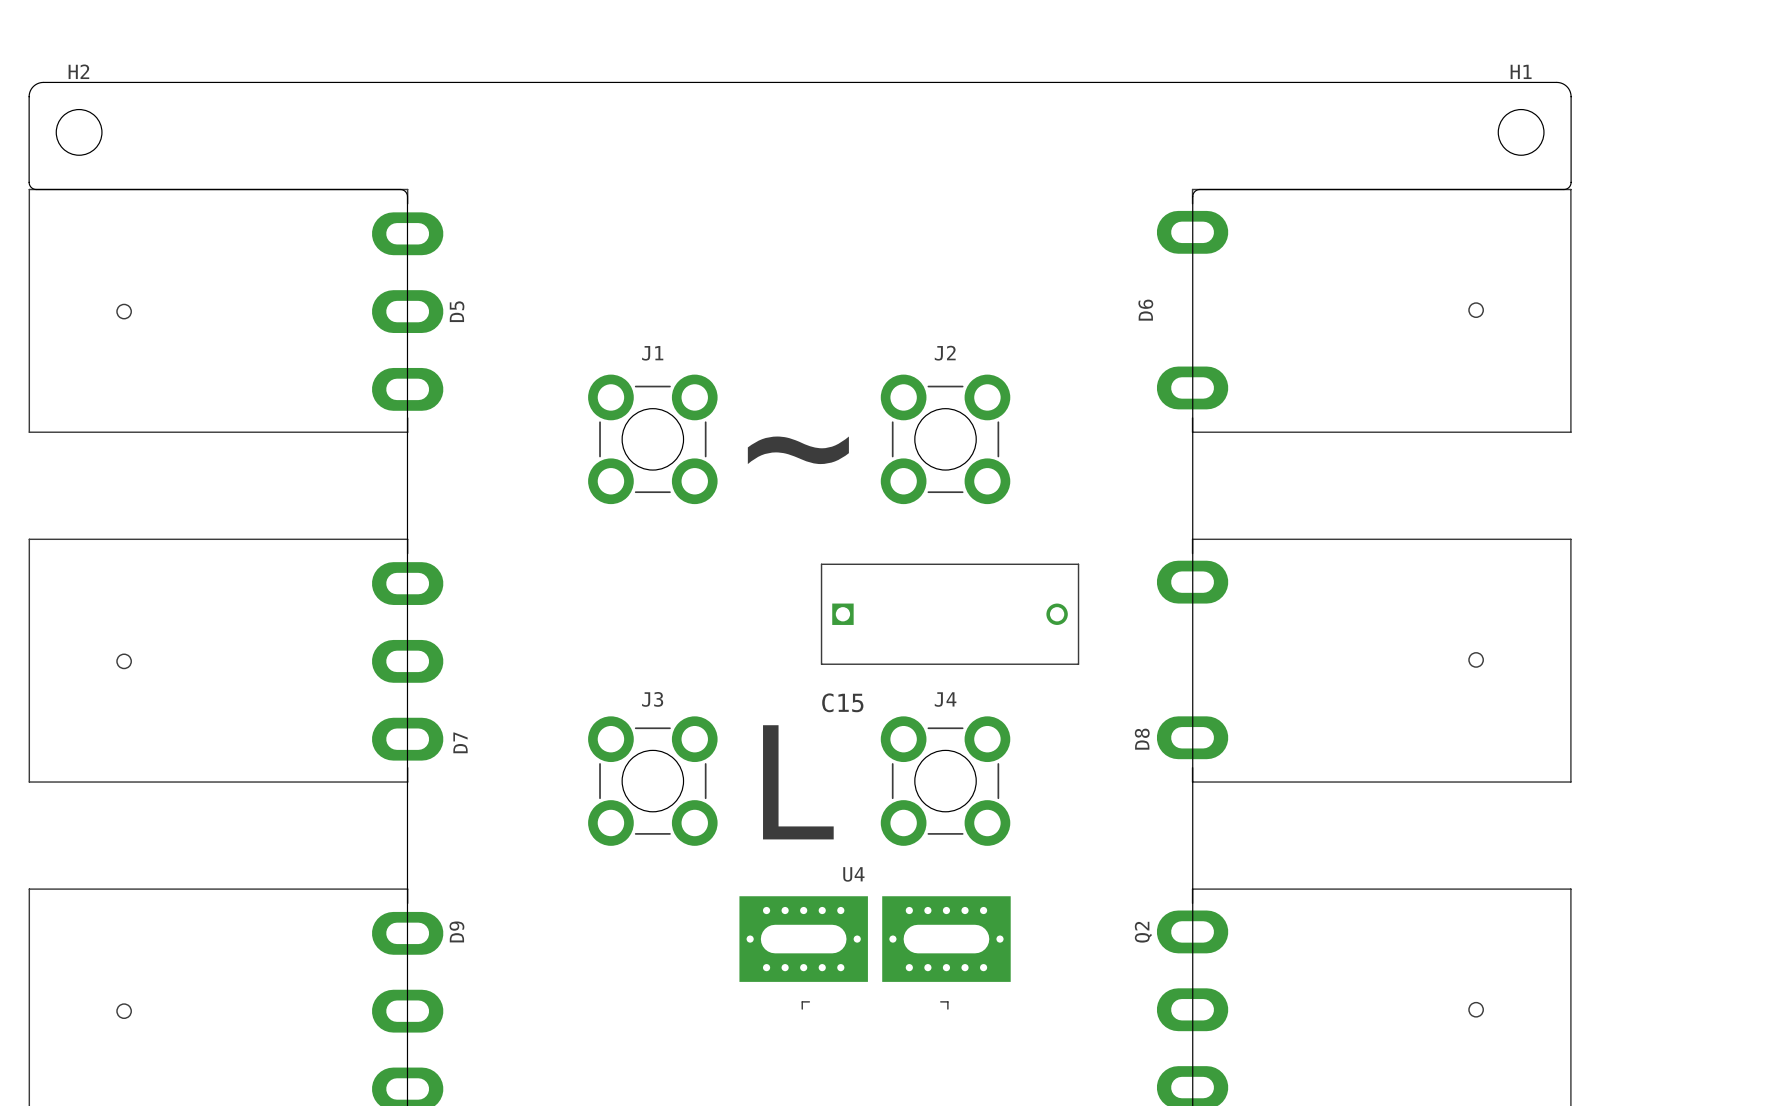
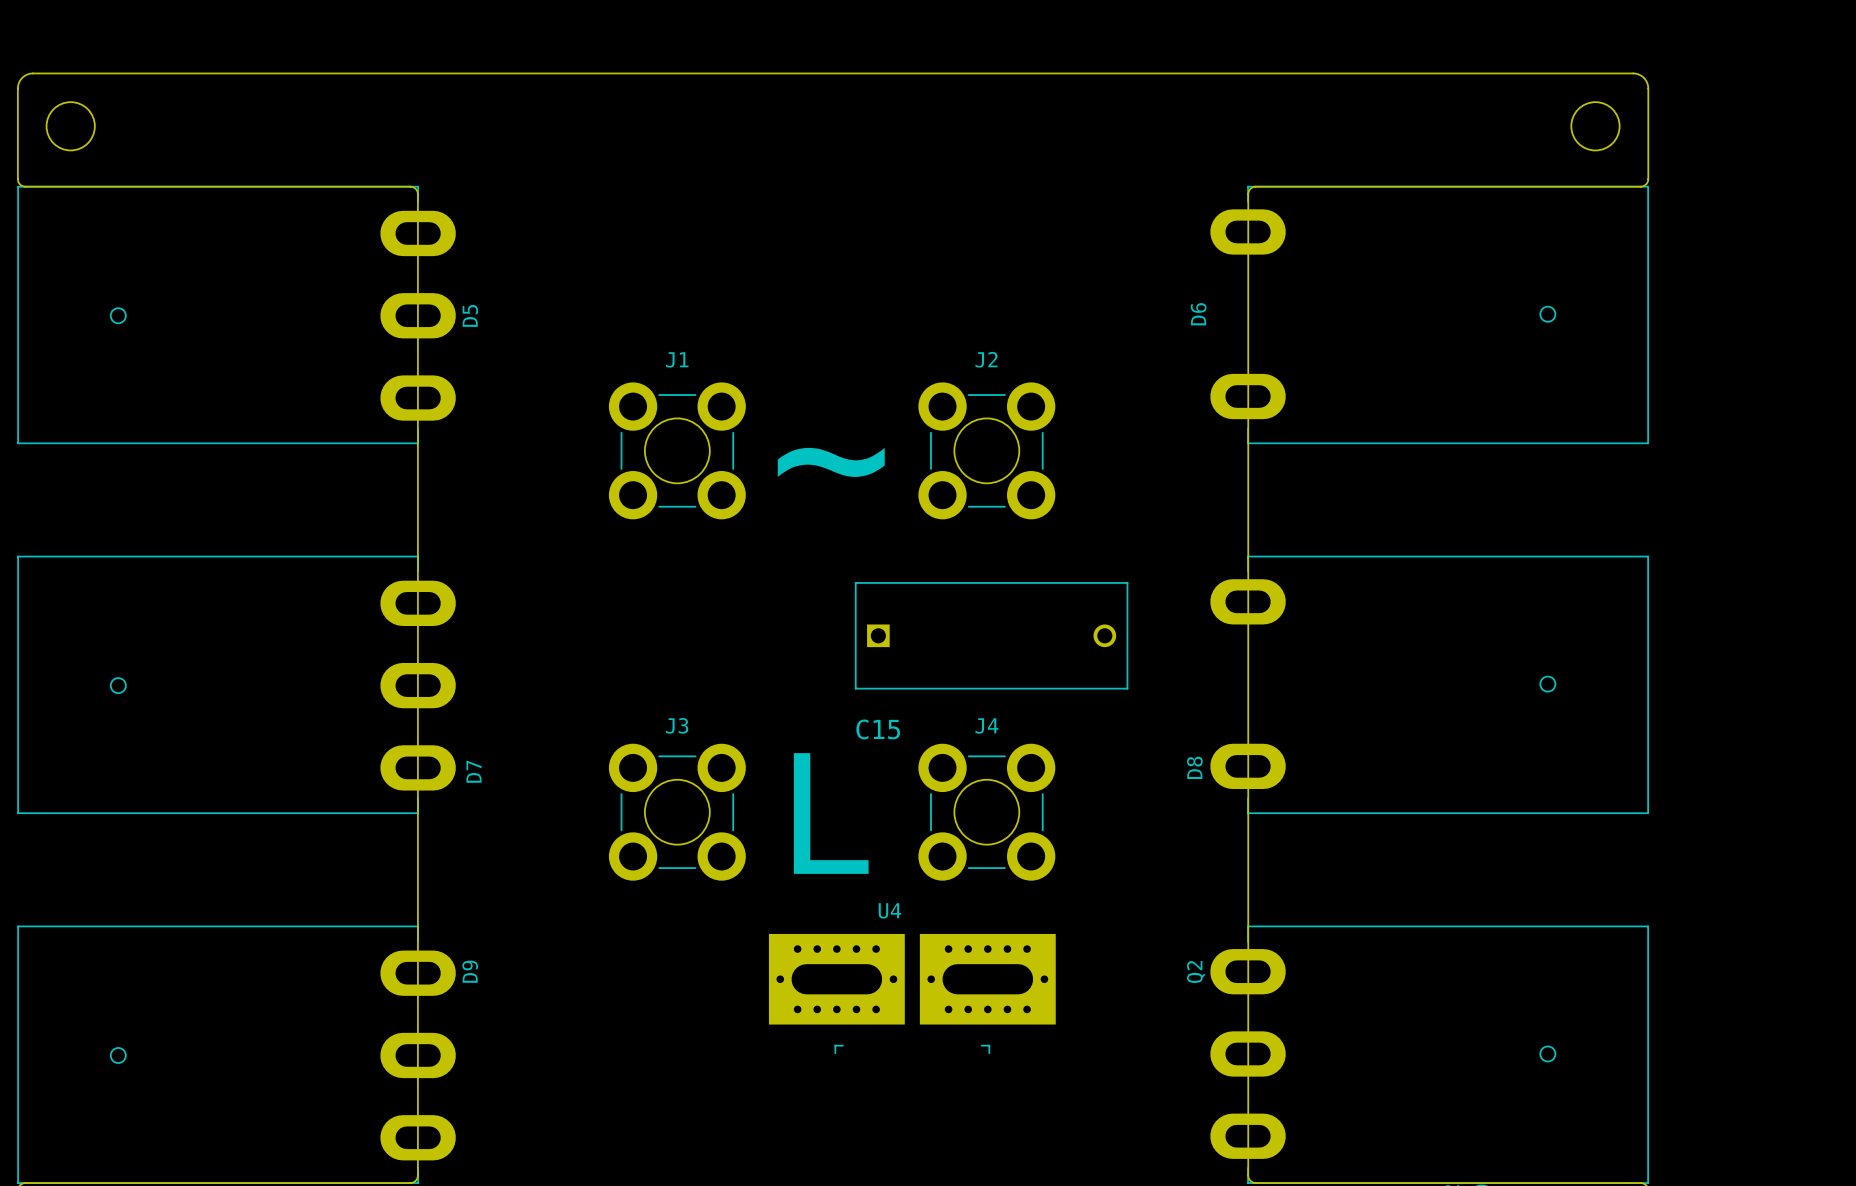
H2 name: H2 (78, 71) -> none
H1 name: H1 (1521, 71) -> none

